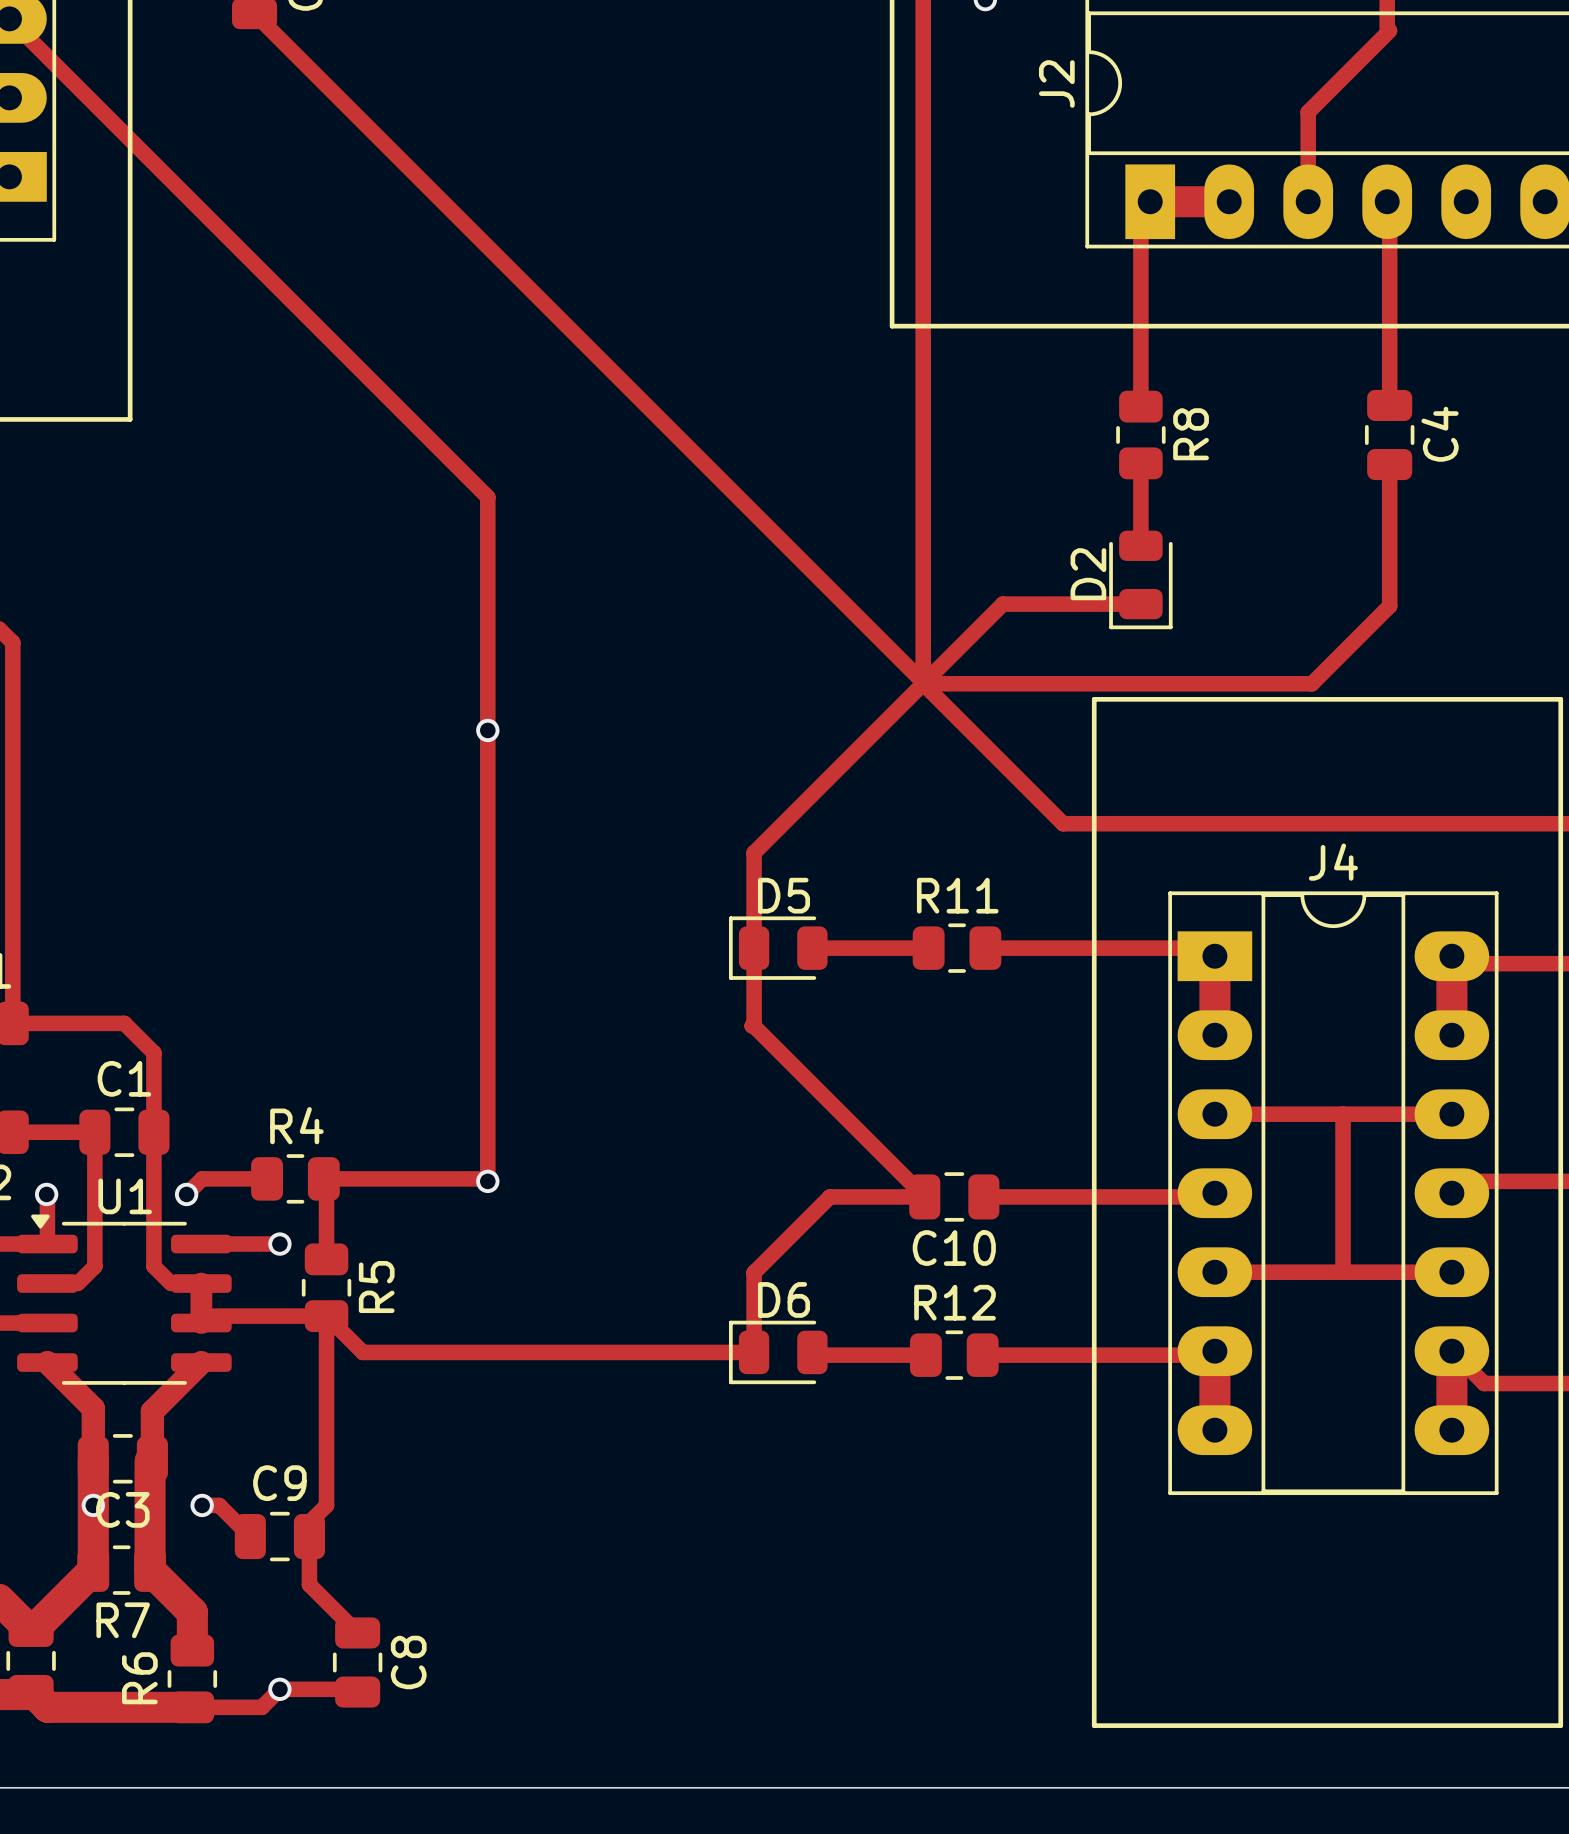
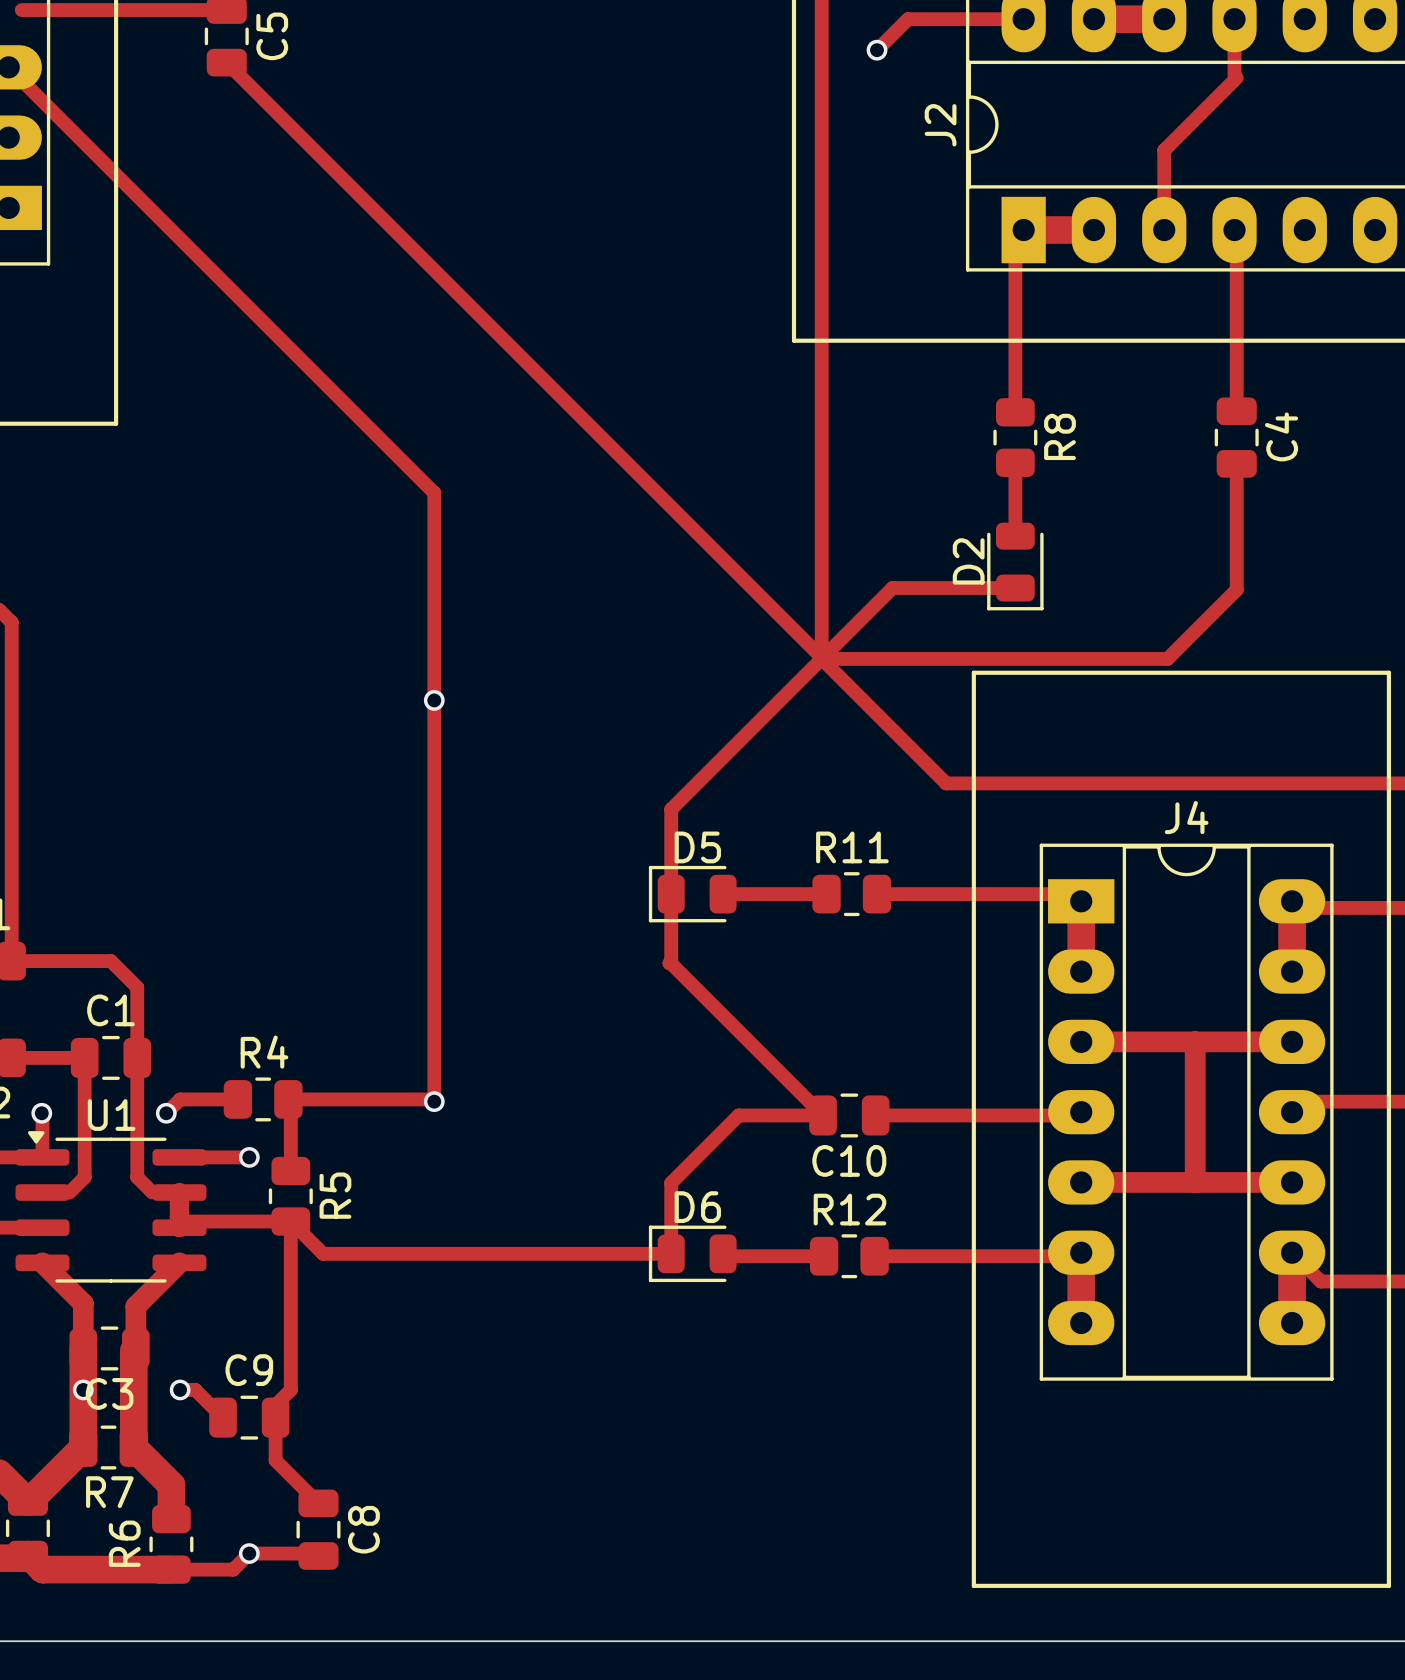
track width: thin (1214, 1114) (1451, 1114) -> thick (1081, 1041) (1292, 1041)
track width: thin (1343, 1114) (1343, 1272) -> thick (1195, 1041) (1195, 1182)
track width: thin (1214, 1272) (1451, 1272) -> thick (1081, 1182) (1292, 1182)

